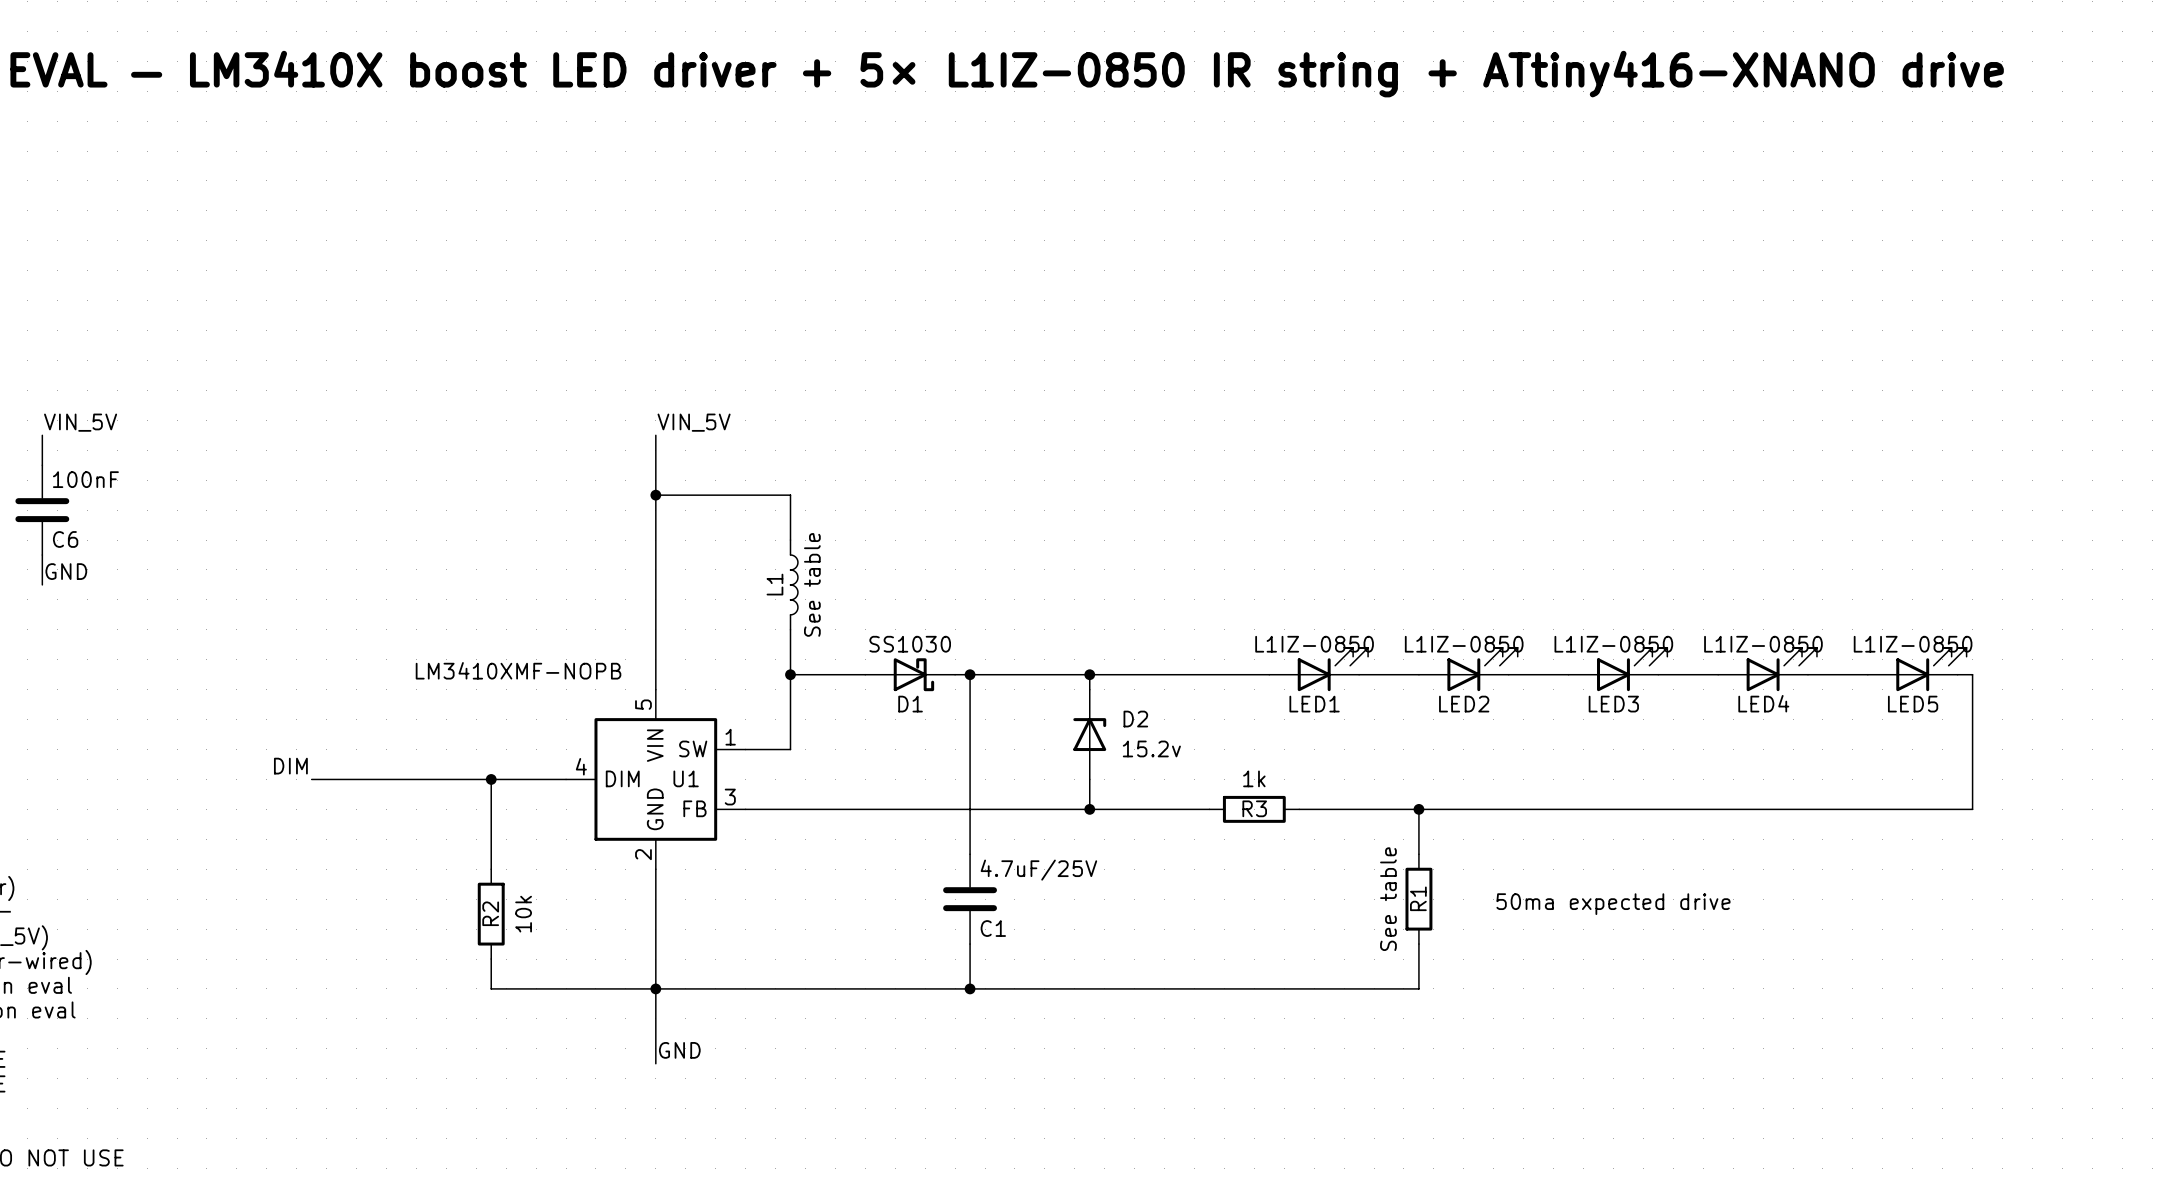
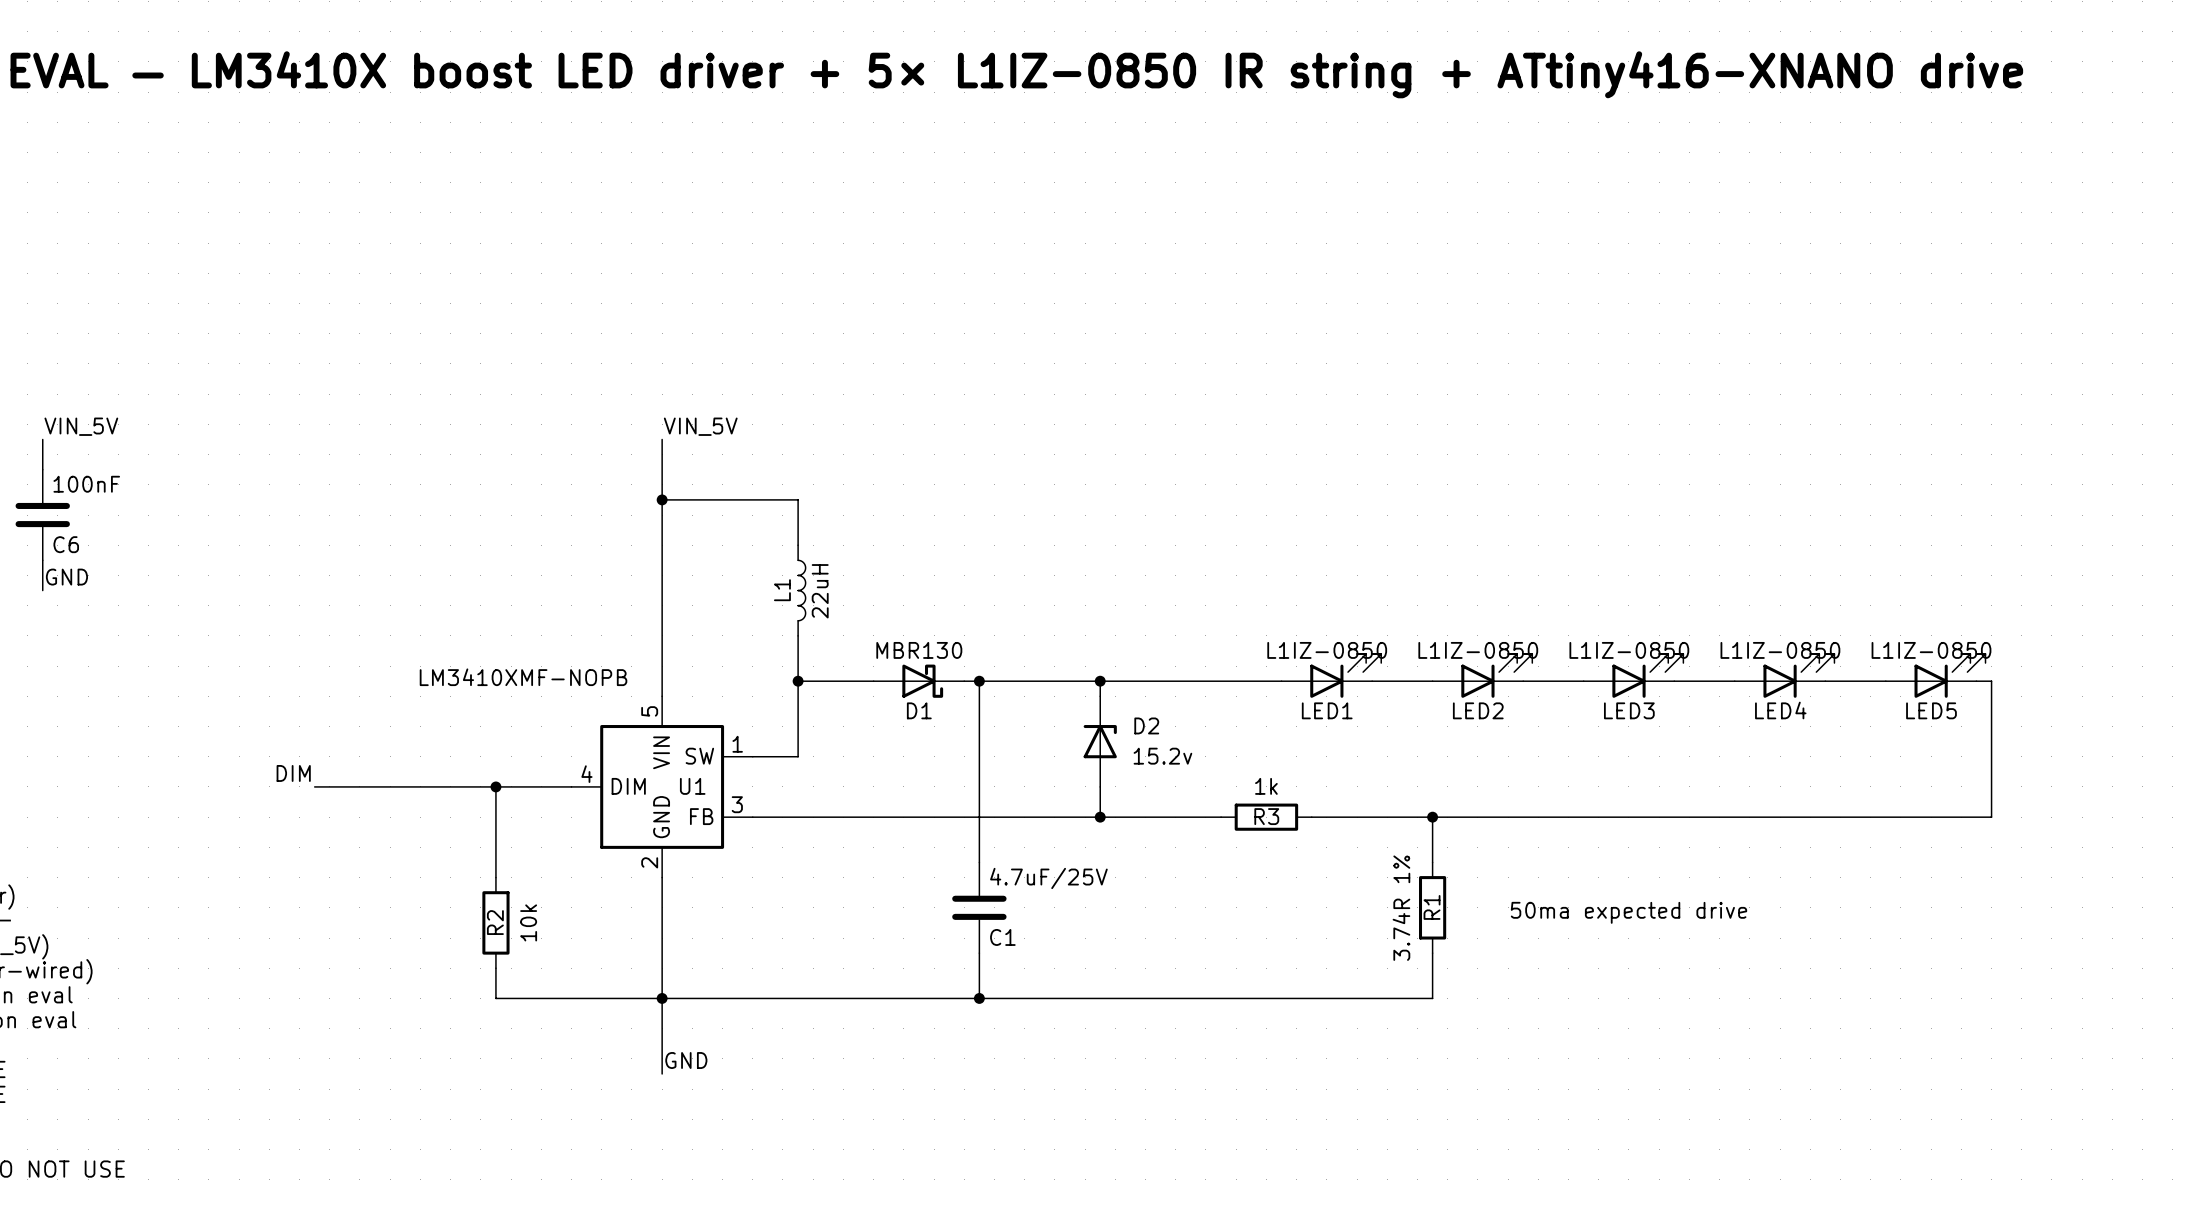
L1 value: See table (812, 584) -> 22uH (820, 591)
D1 value: SS1030 (910, 644) -> MBR130 (919, 650)
R1 value: See table (1388, 899) -> 3.74R 1% (1401, 908)

